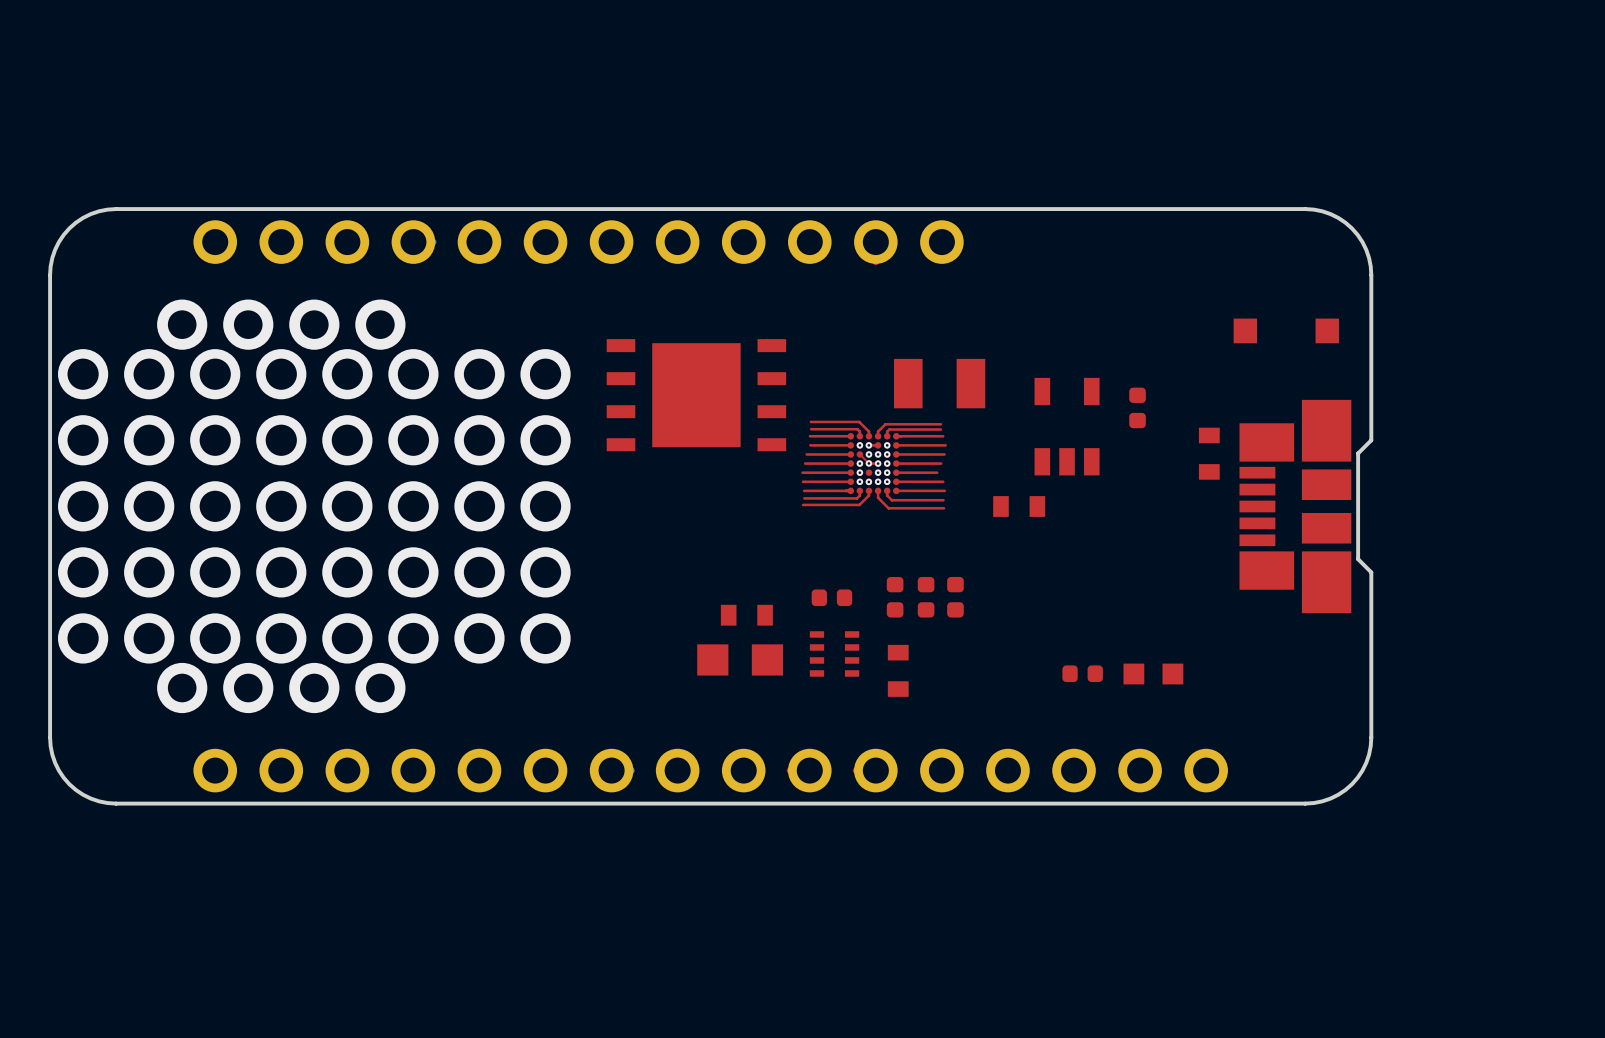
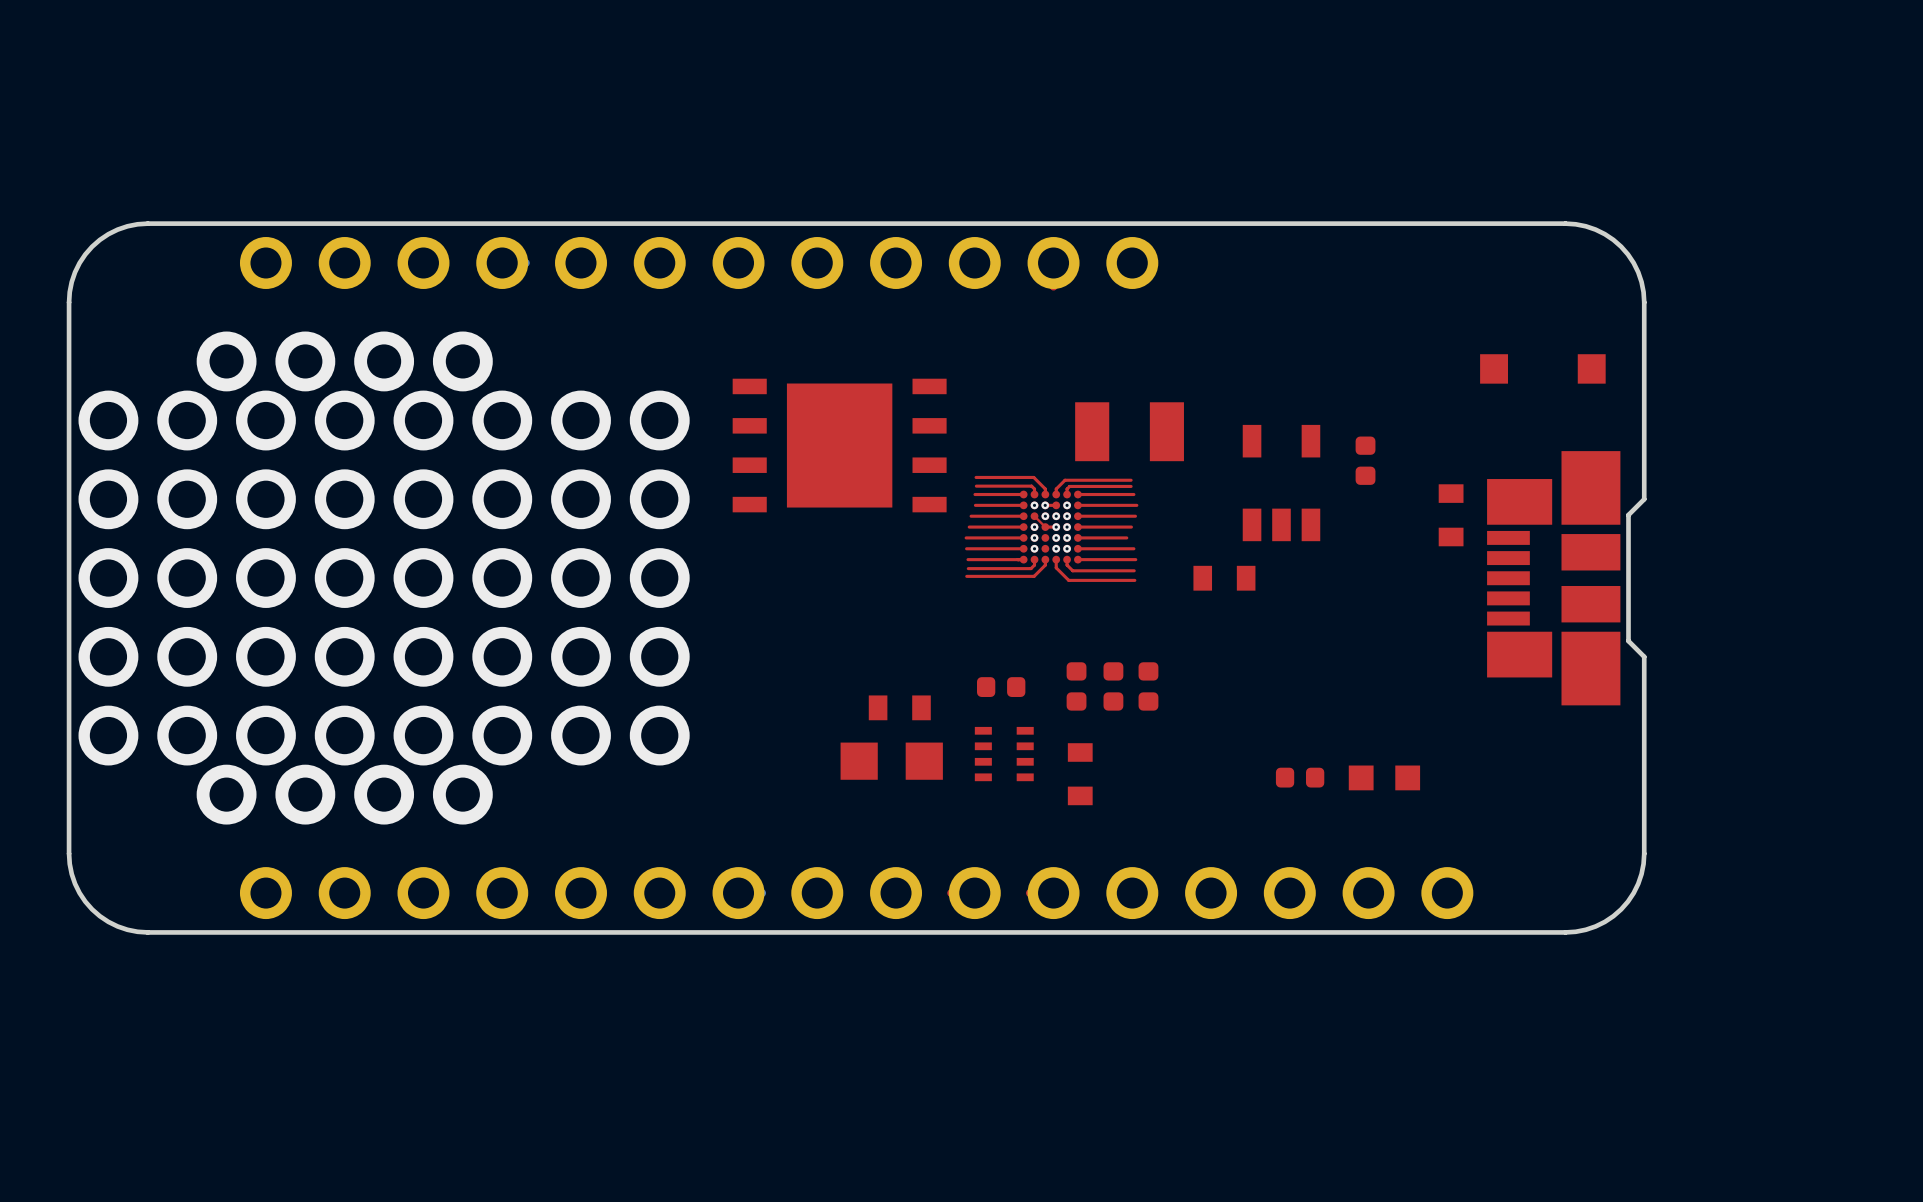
via: (868, 463) -> none
via: (868, 481) -> none

